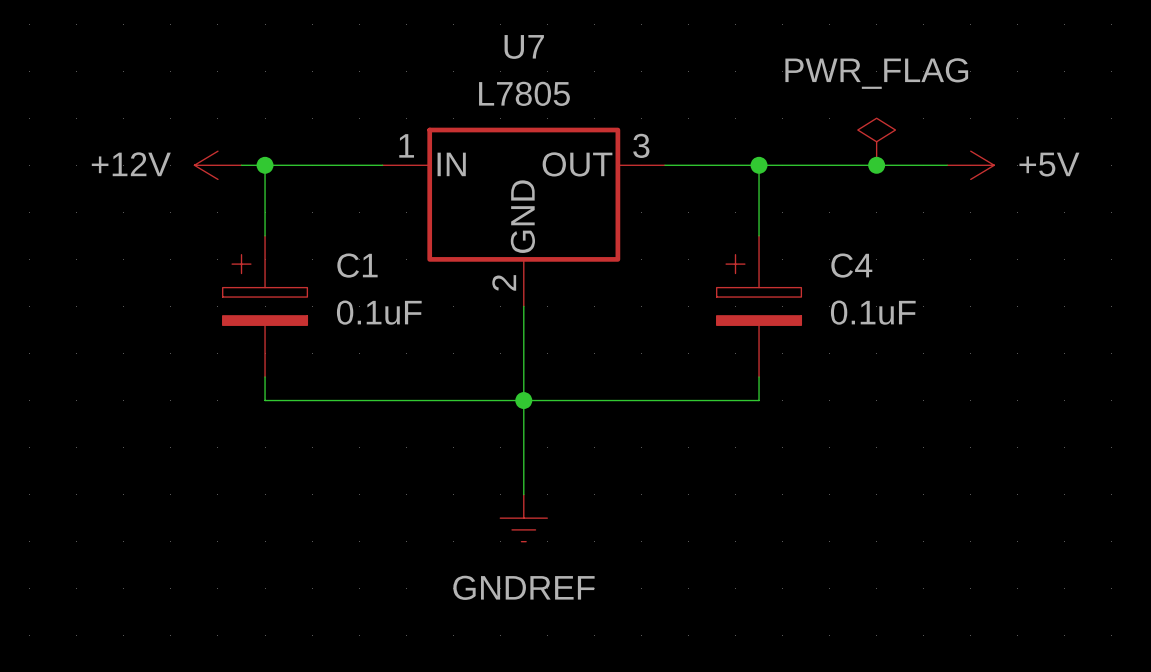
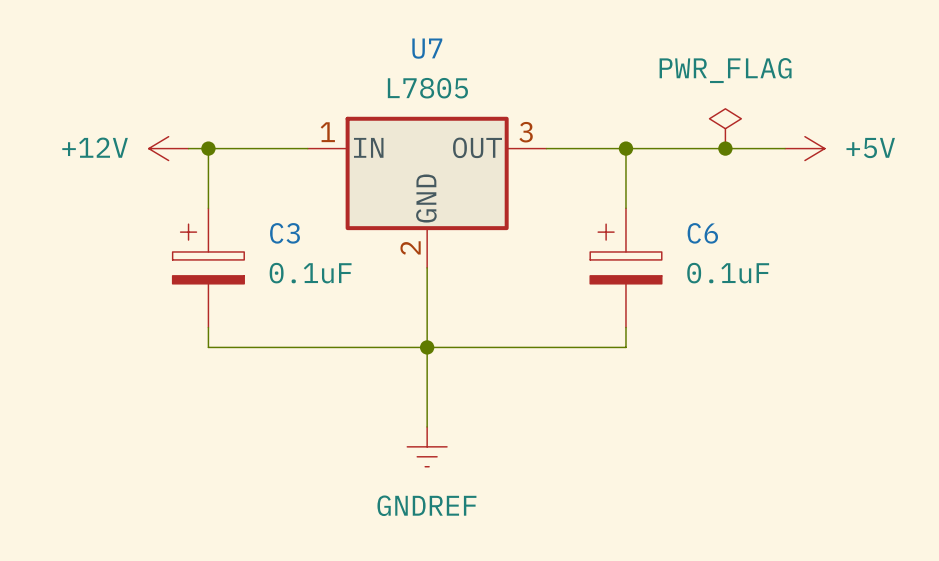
C1 name: C1 (357, 265) -> C3 (285, 233)
C4 name: C4 (851, 265) -> C6 (702, 233)

